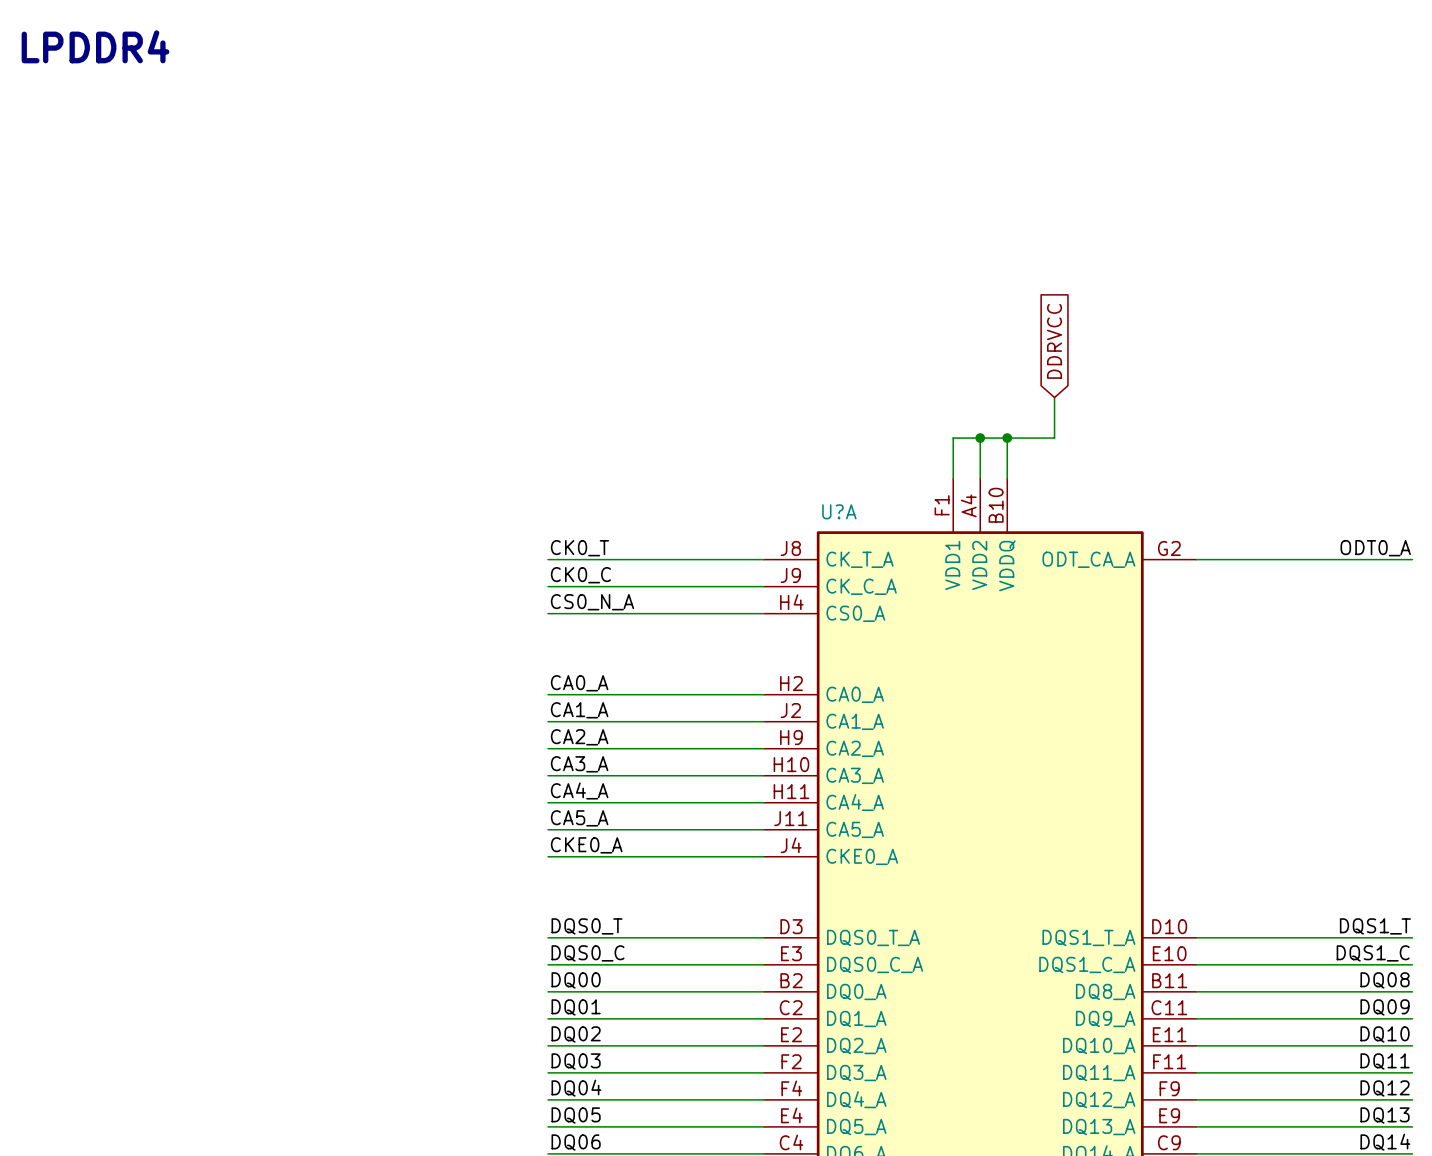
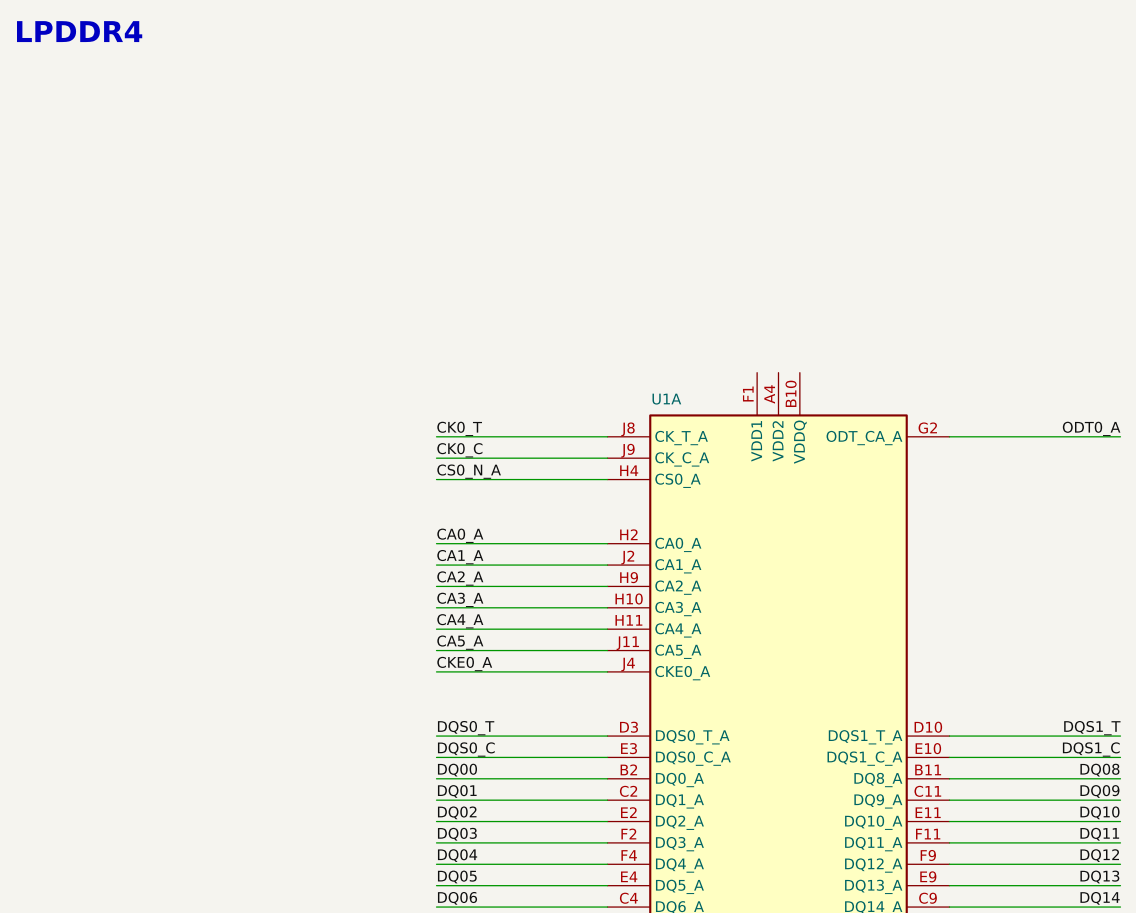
global label: DDRVCC (1054, 341) -> none
wire: (1054, 397) (1054, 438) (953, 438) (953, 478) -> none
wire: (980, 438) (980, 478) -> none
junction: (980, 438) -> none
wire: (1007, 438) (1007, 478) -> none
junction: (1007, 438) -> none
U?A name: U?A (839, 511) -> U1A (666, 399)

